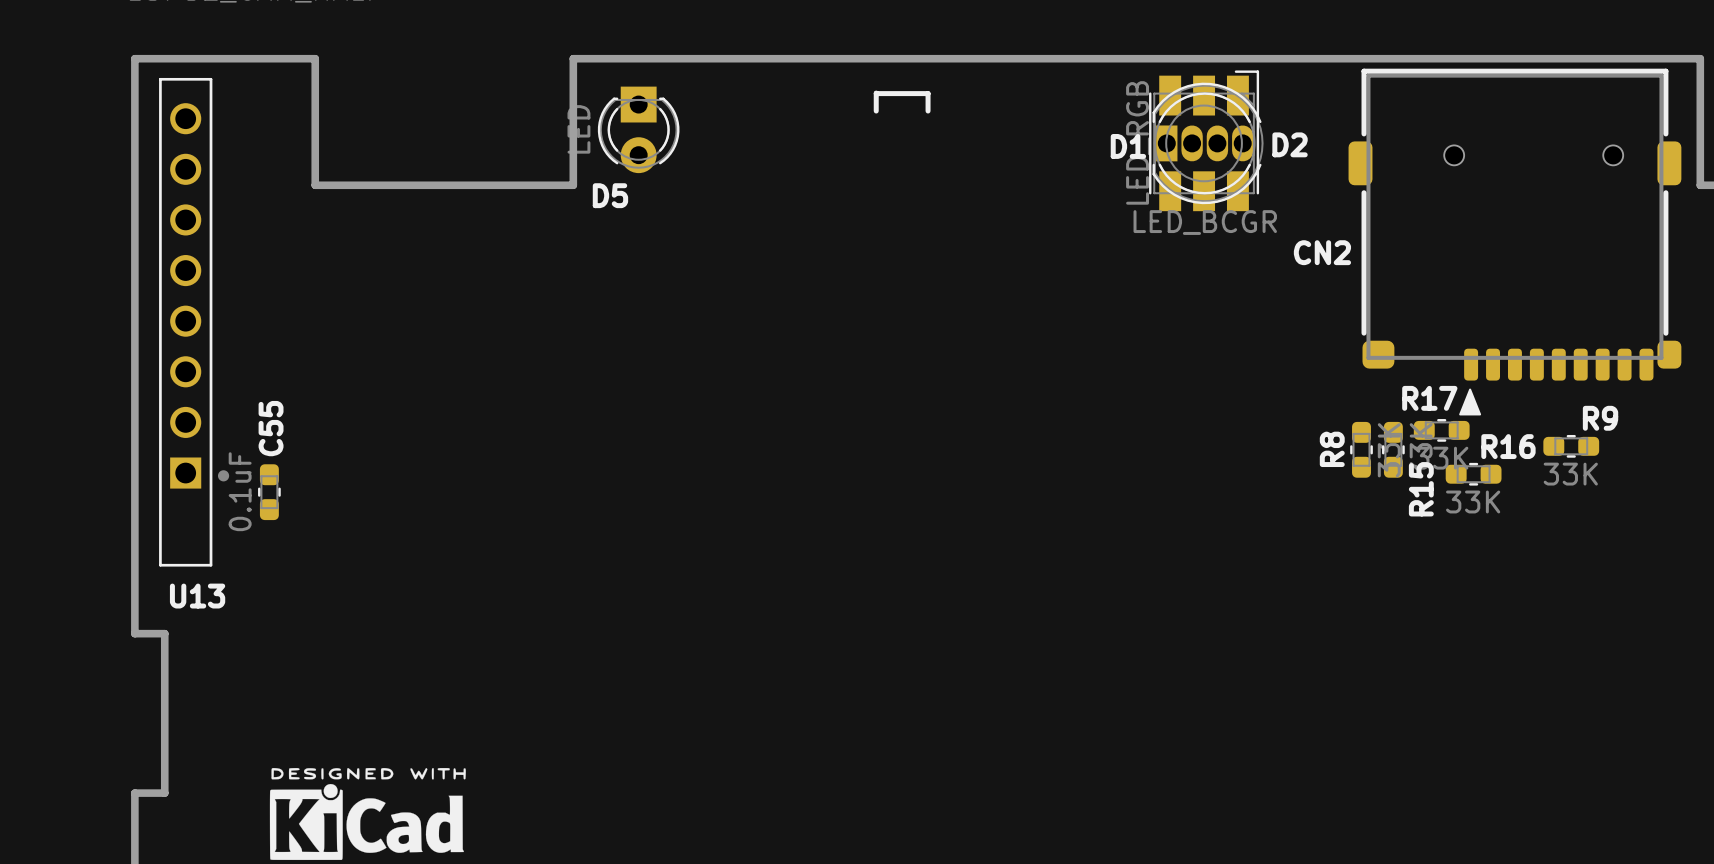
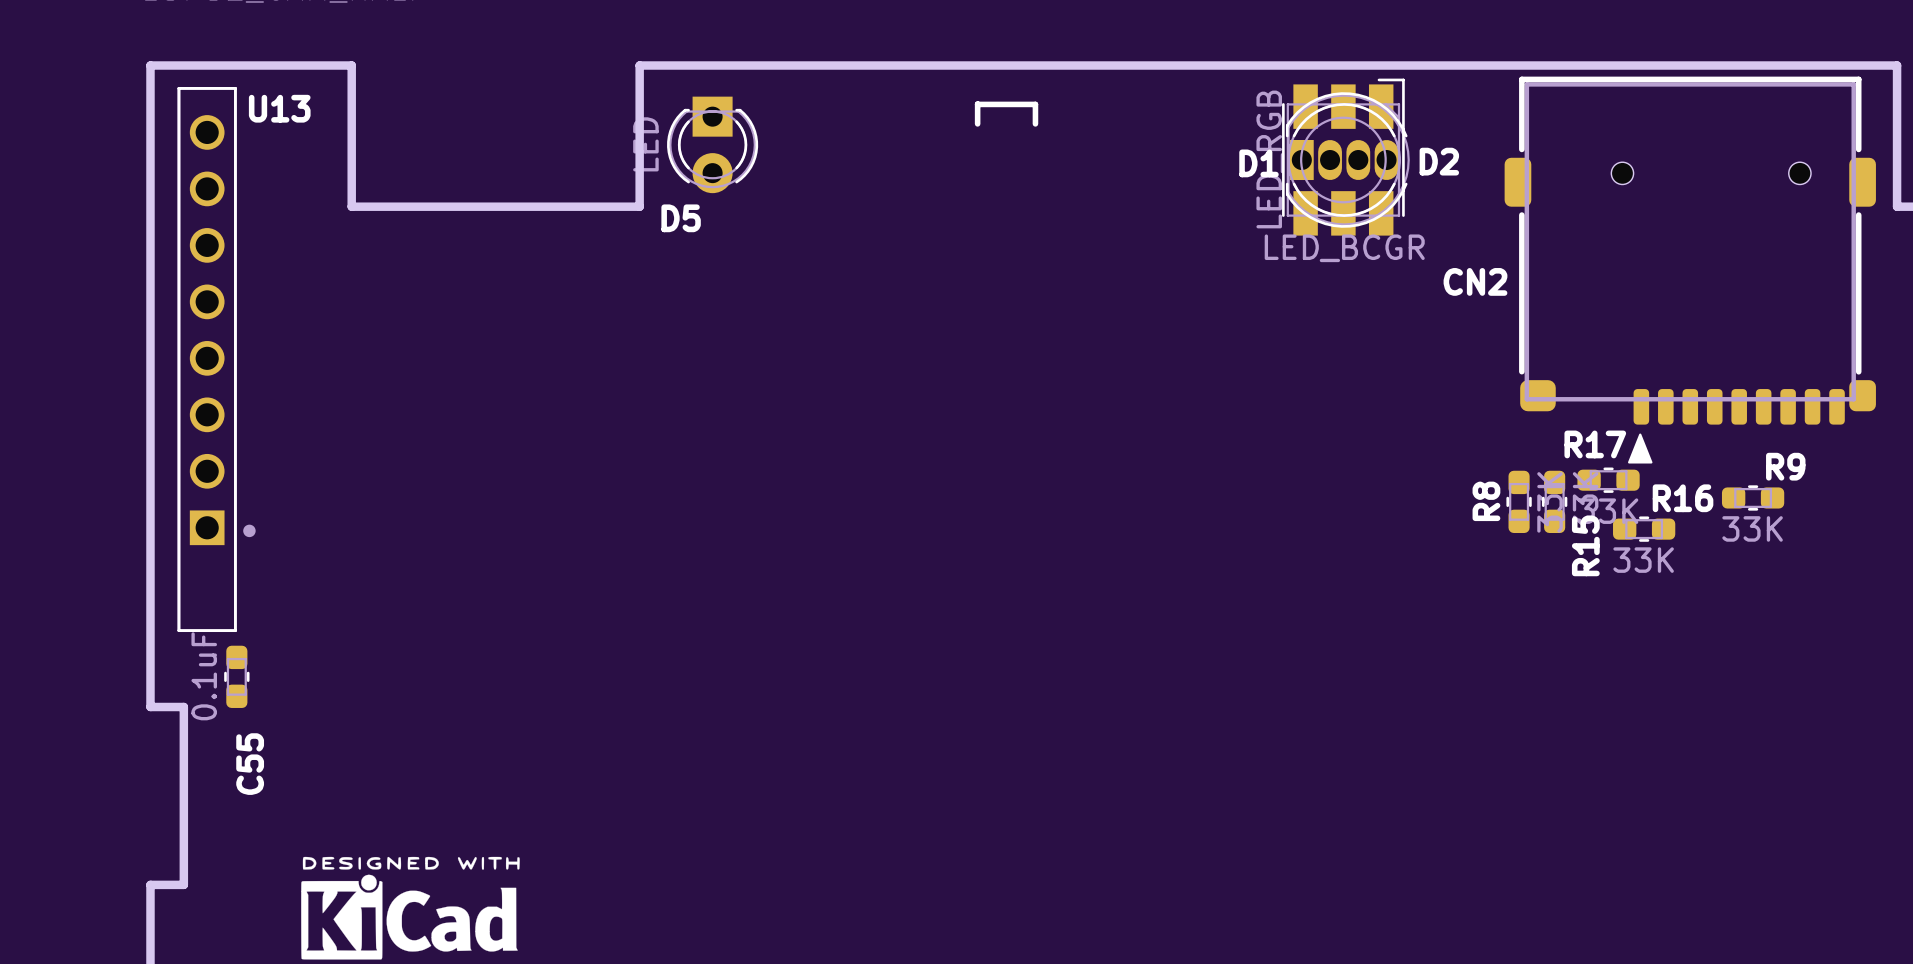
C55 name position: C55 (271, 428) -> C55 (250, 764)
C55 position: (269, 492) -> (236, 676)
U13 name position: U13 (197, 596) -> U13 (279, 108)

